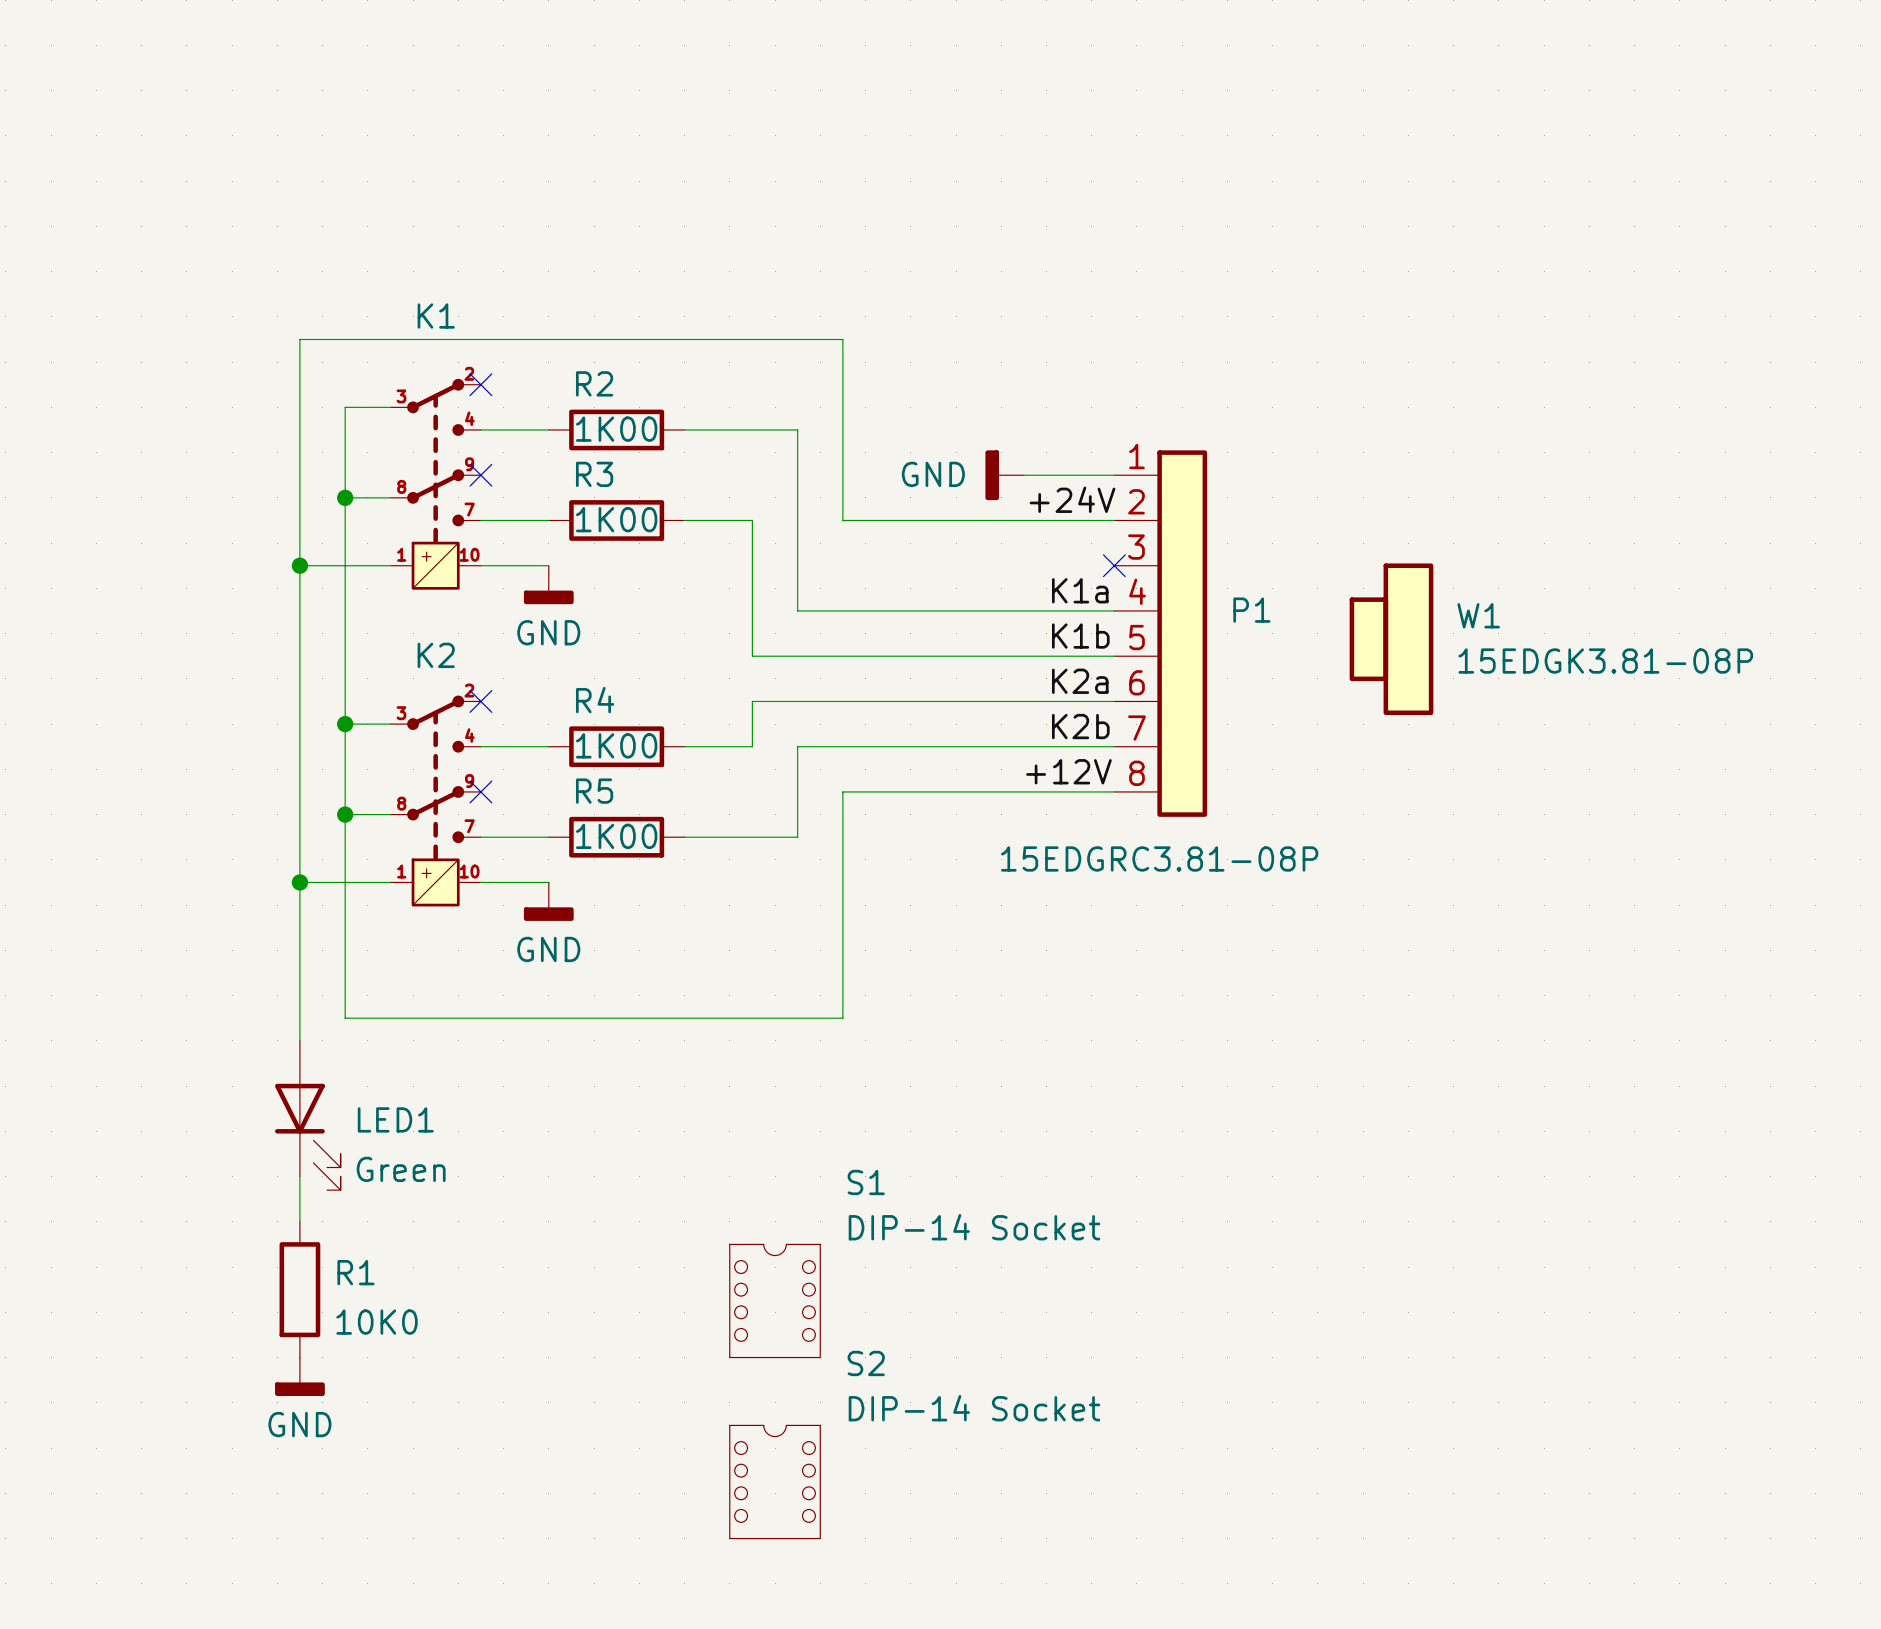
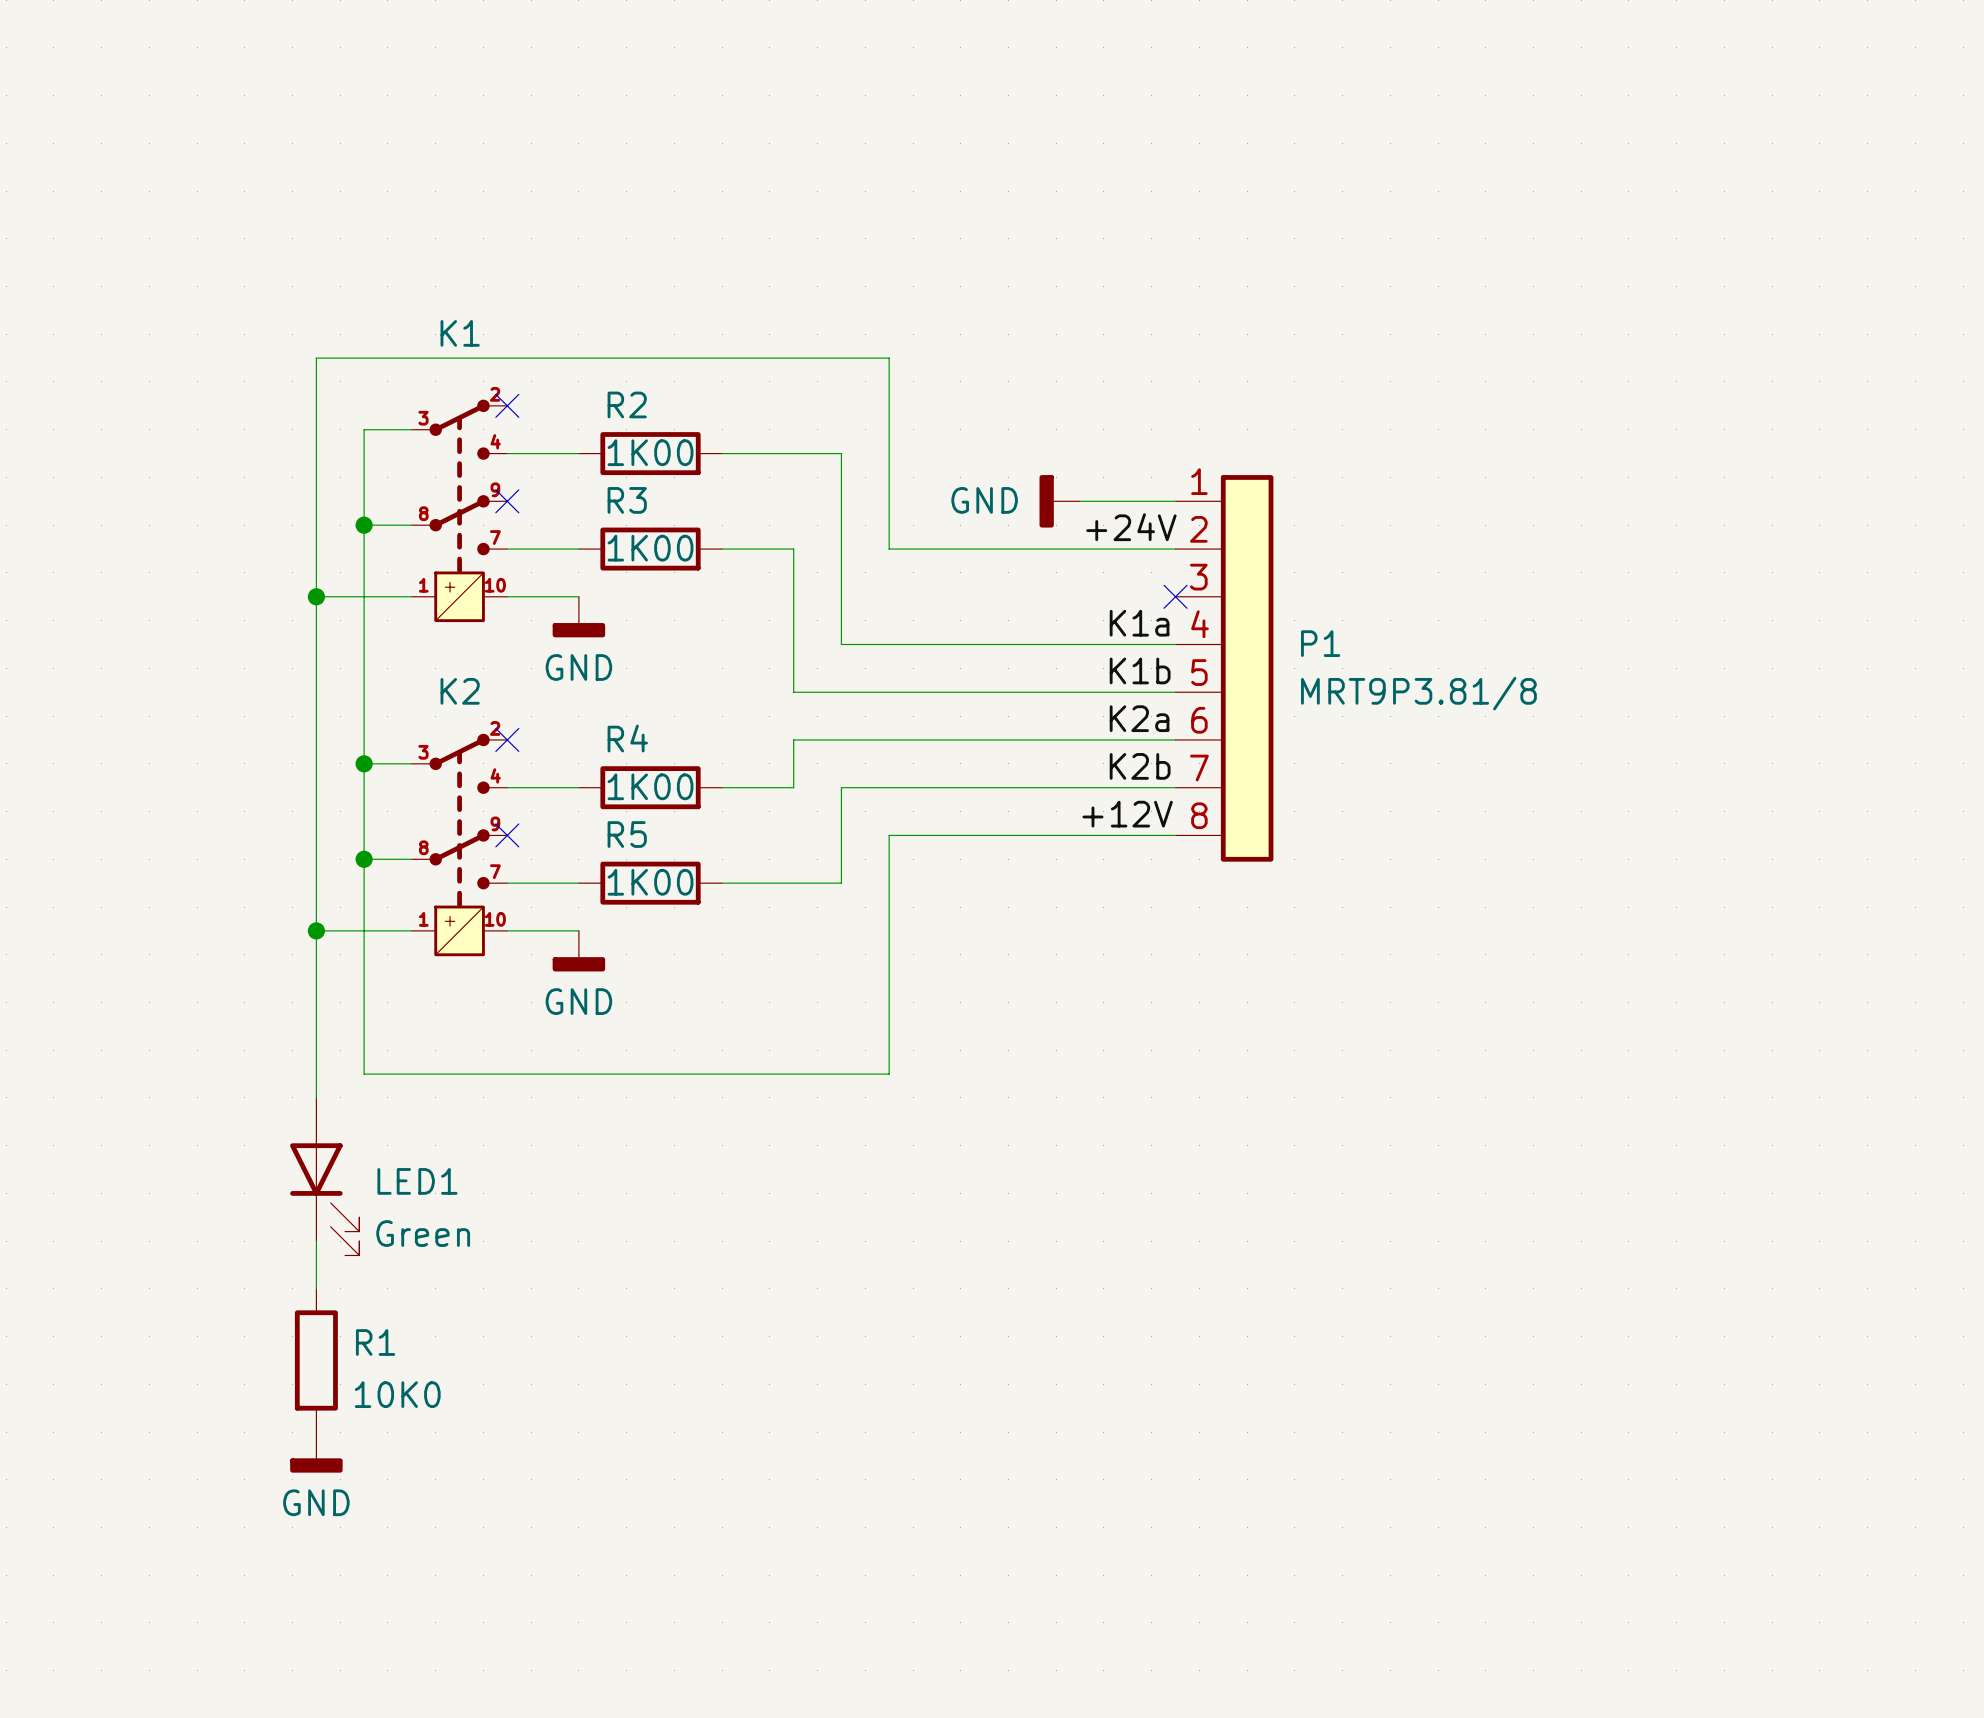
W1: (1391, 639) -> none
P1 text: 15EDGRC3.81-08P (1159, 858) -> MRT9P3.81/8 (1418, 693)
S1: (756, 1205) -> none
S2: (756, 1386) -> none

